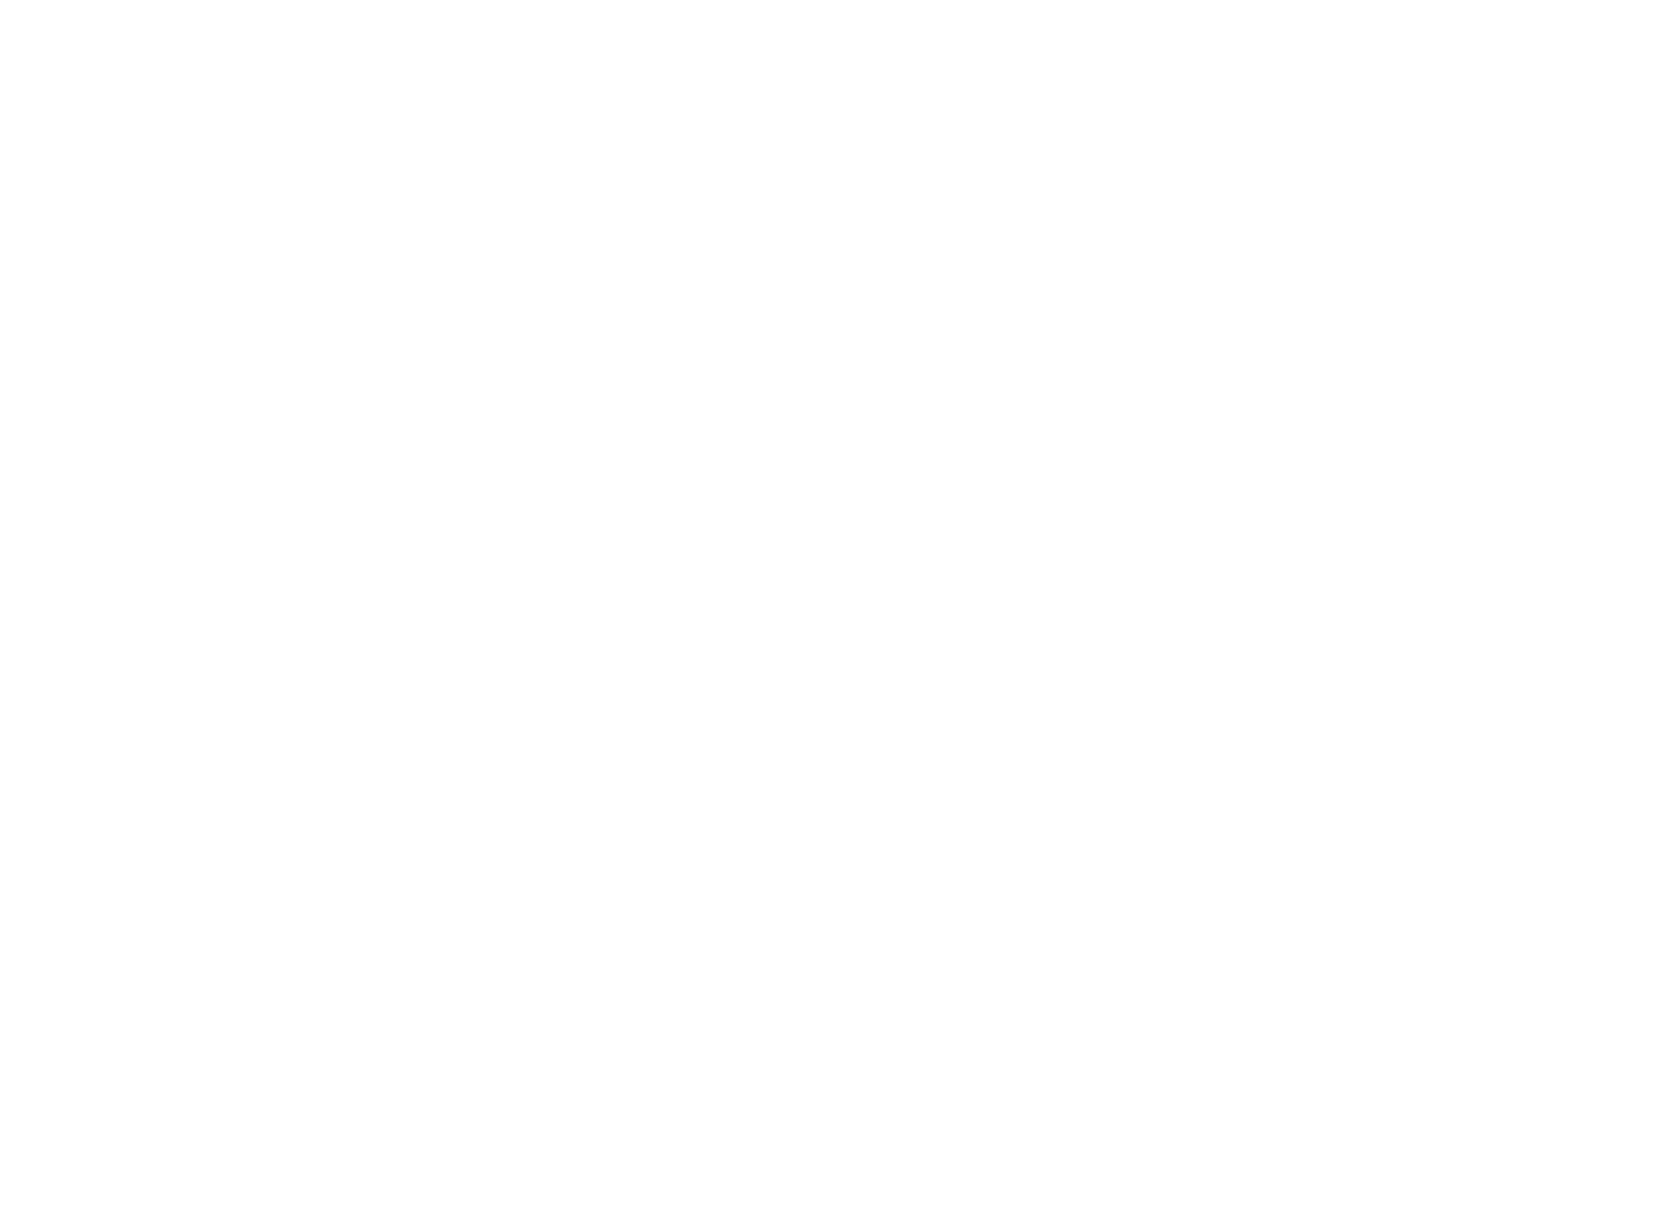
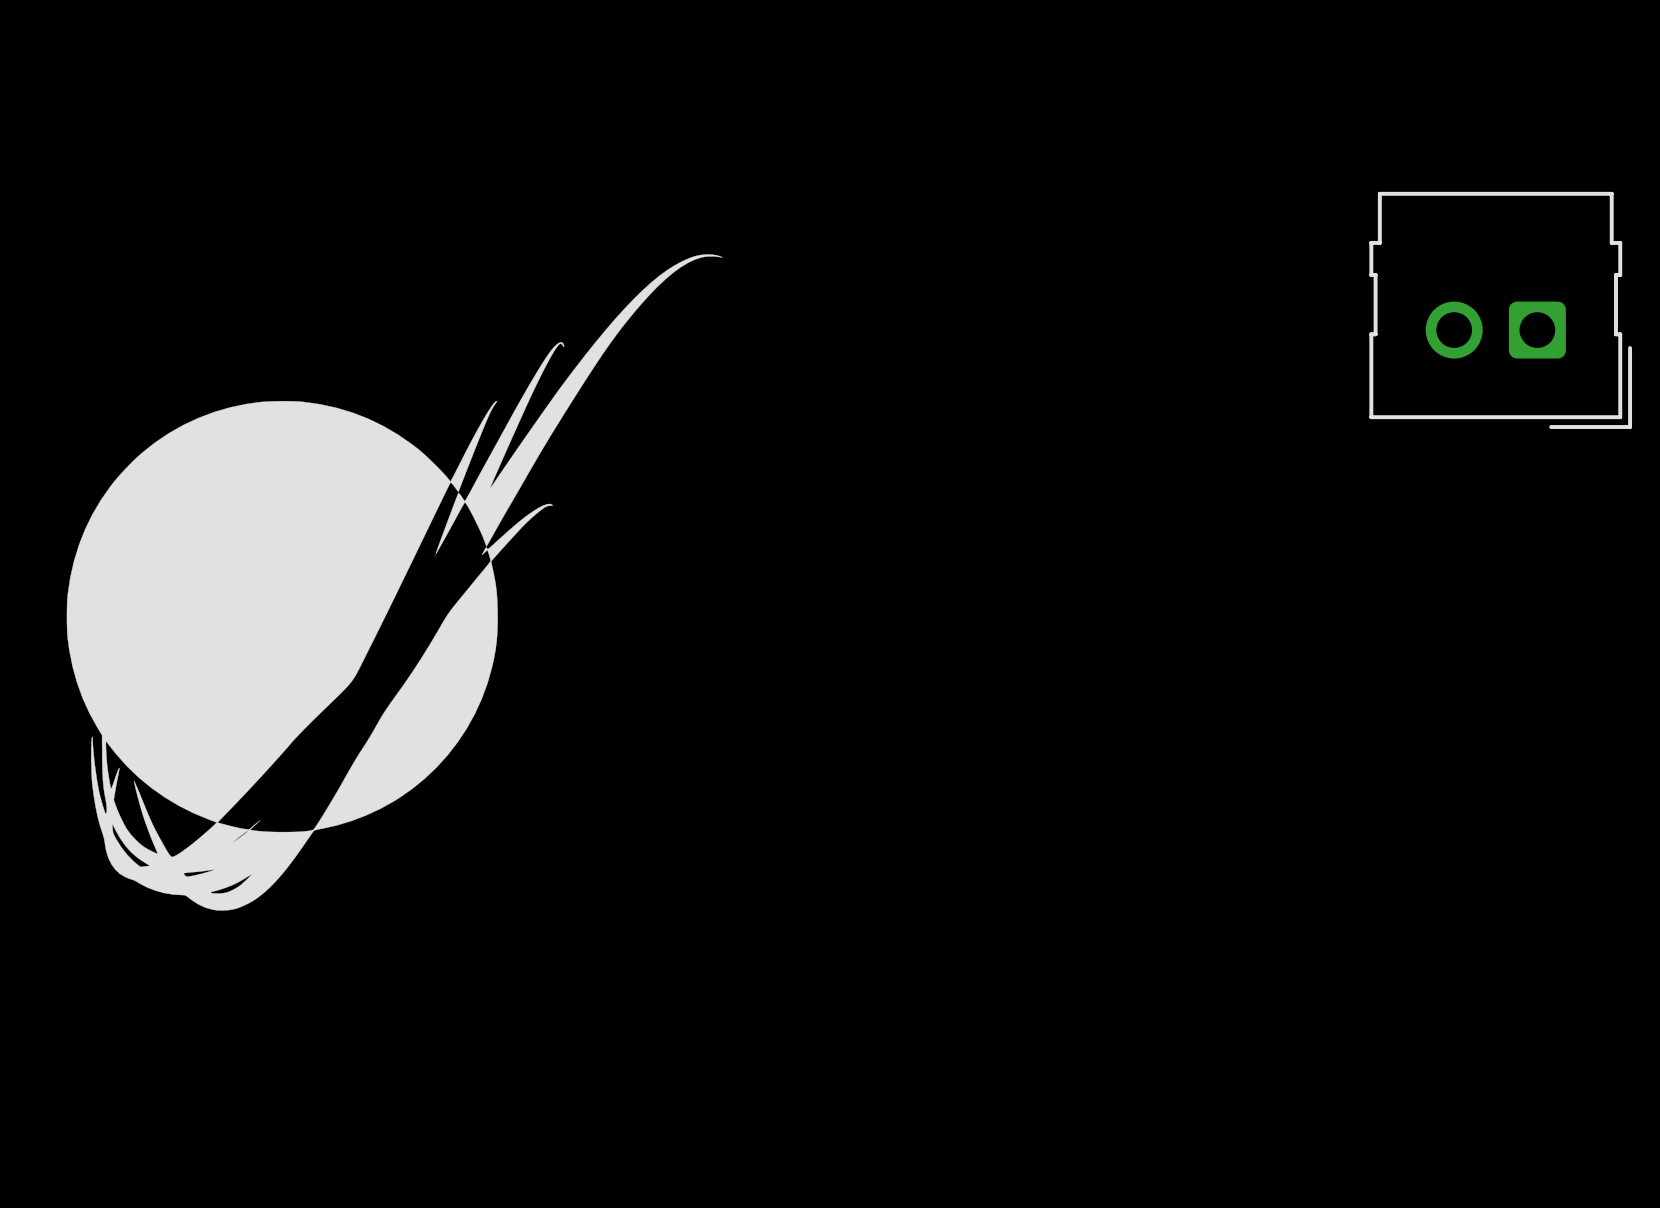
drawing: none -> [66, 254, 723, 911]
part: none -> (1500, 310)

